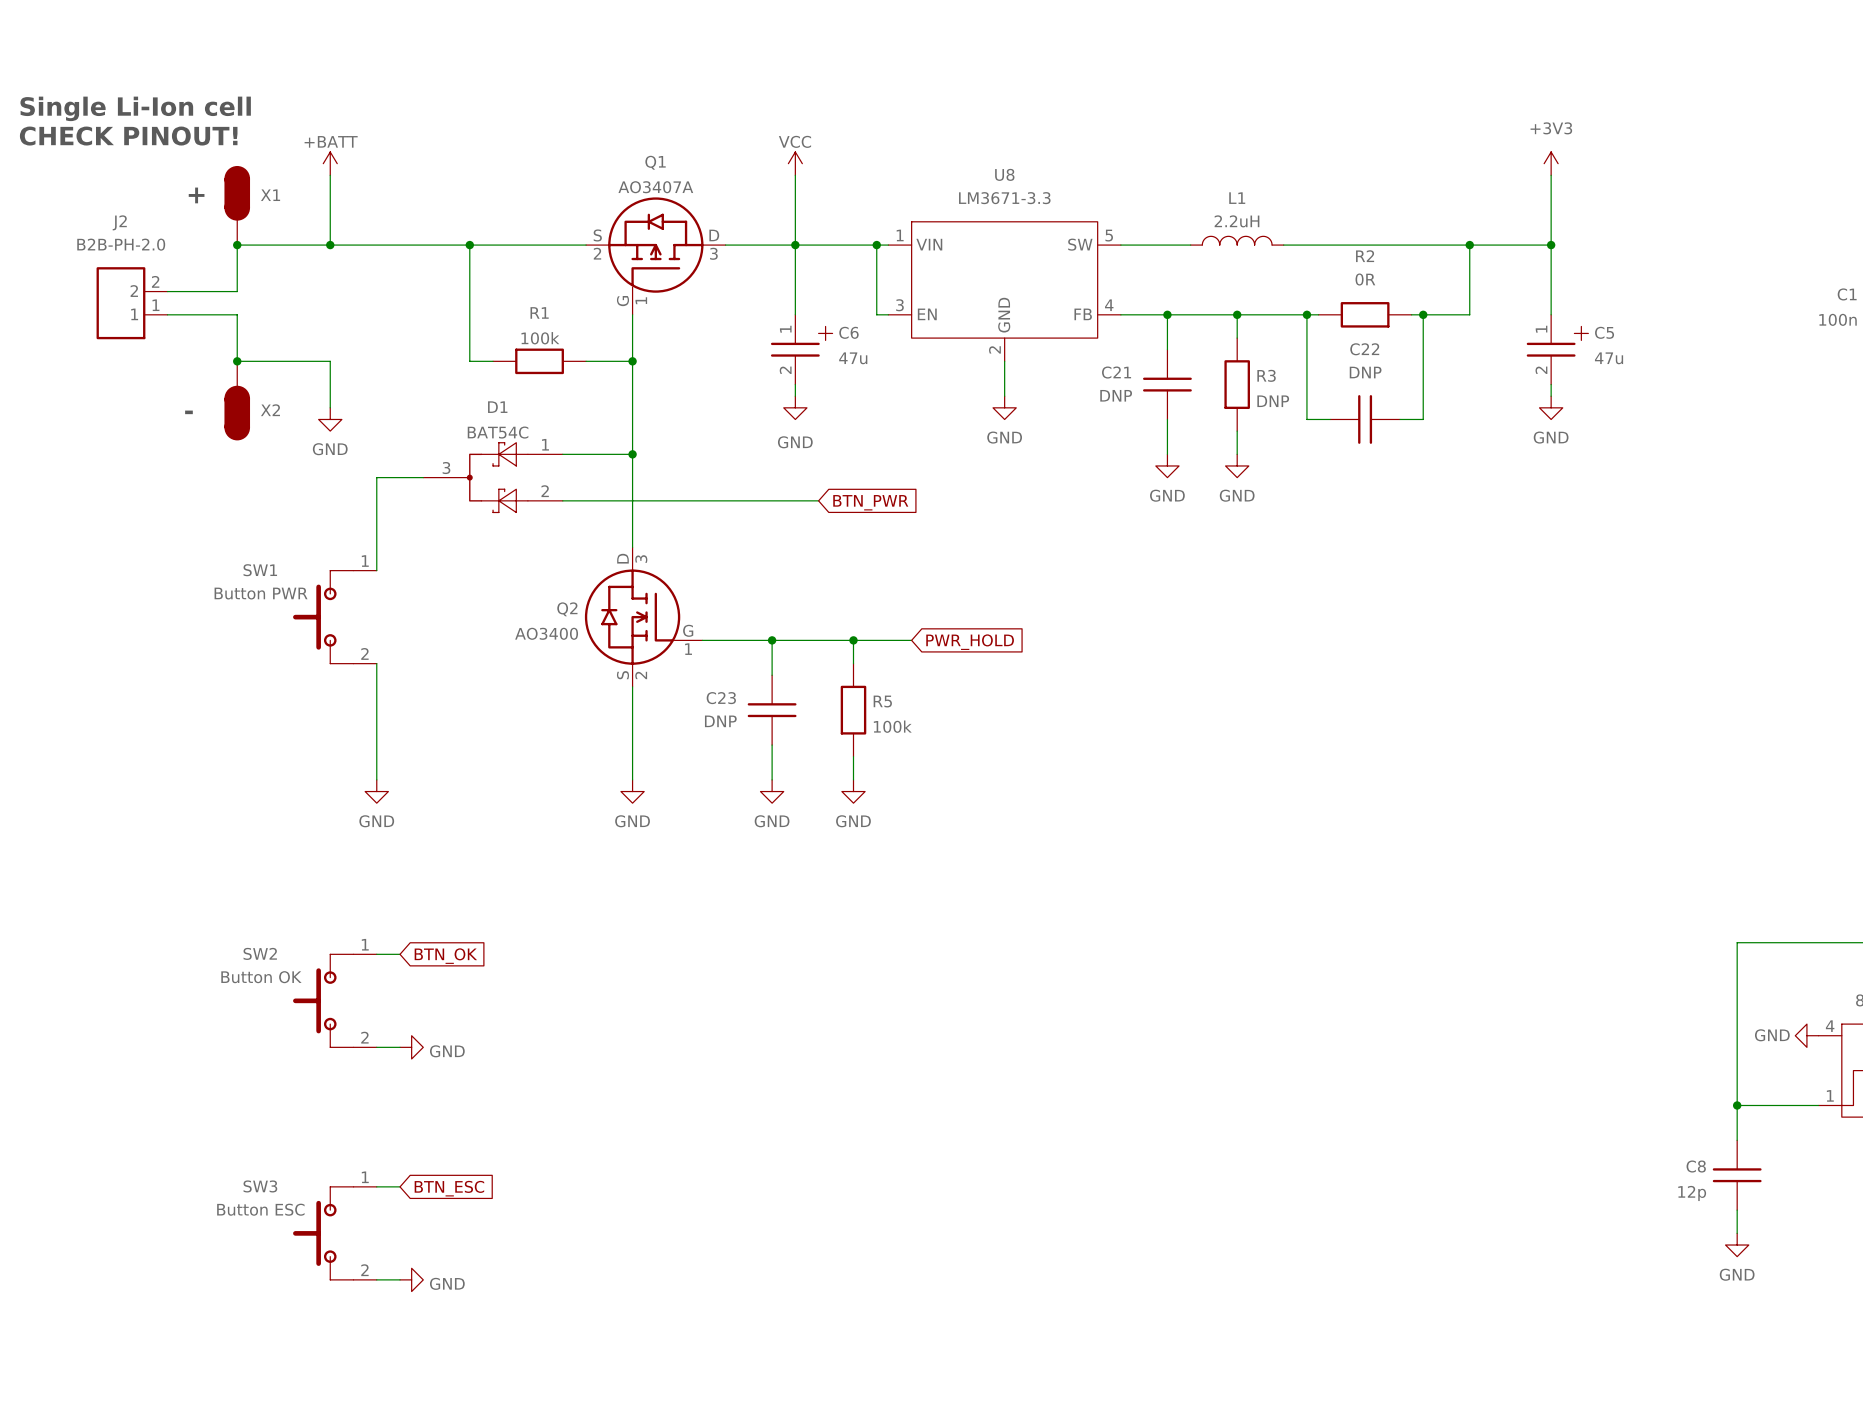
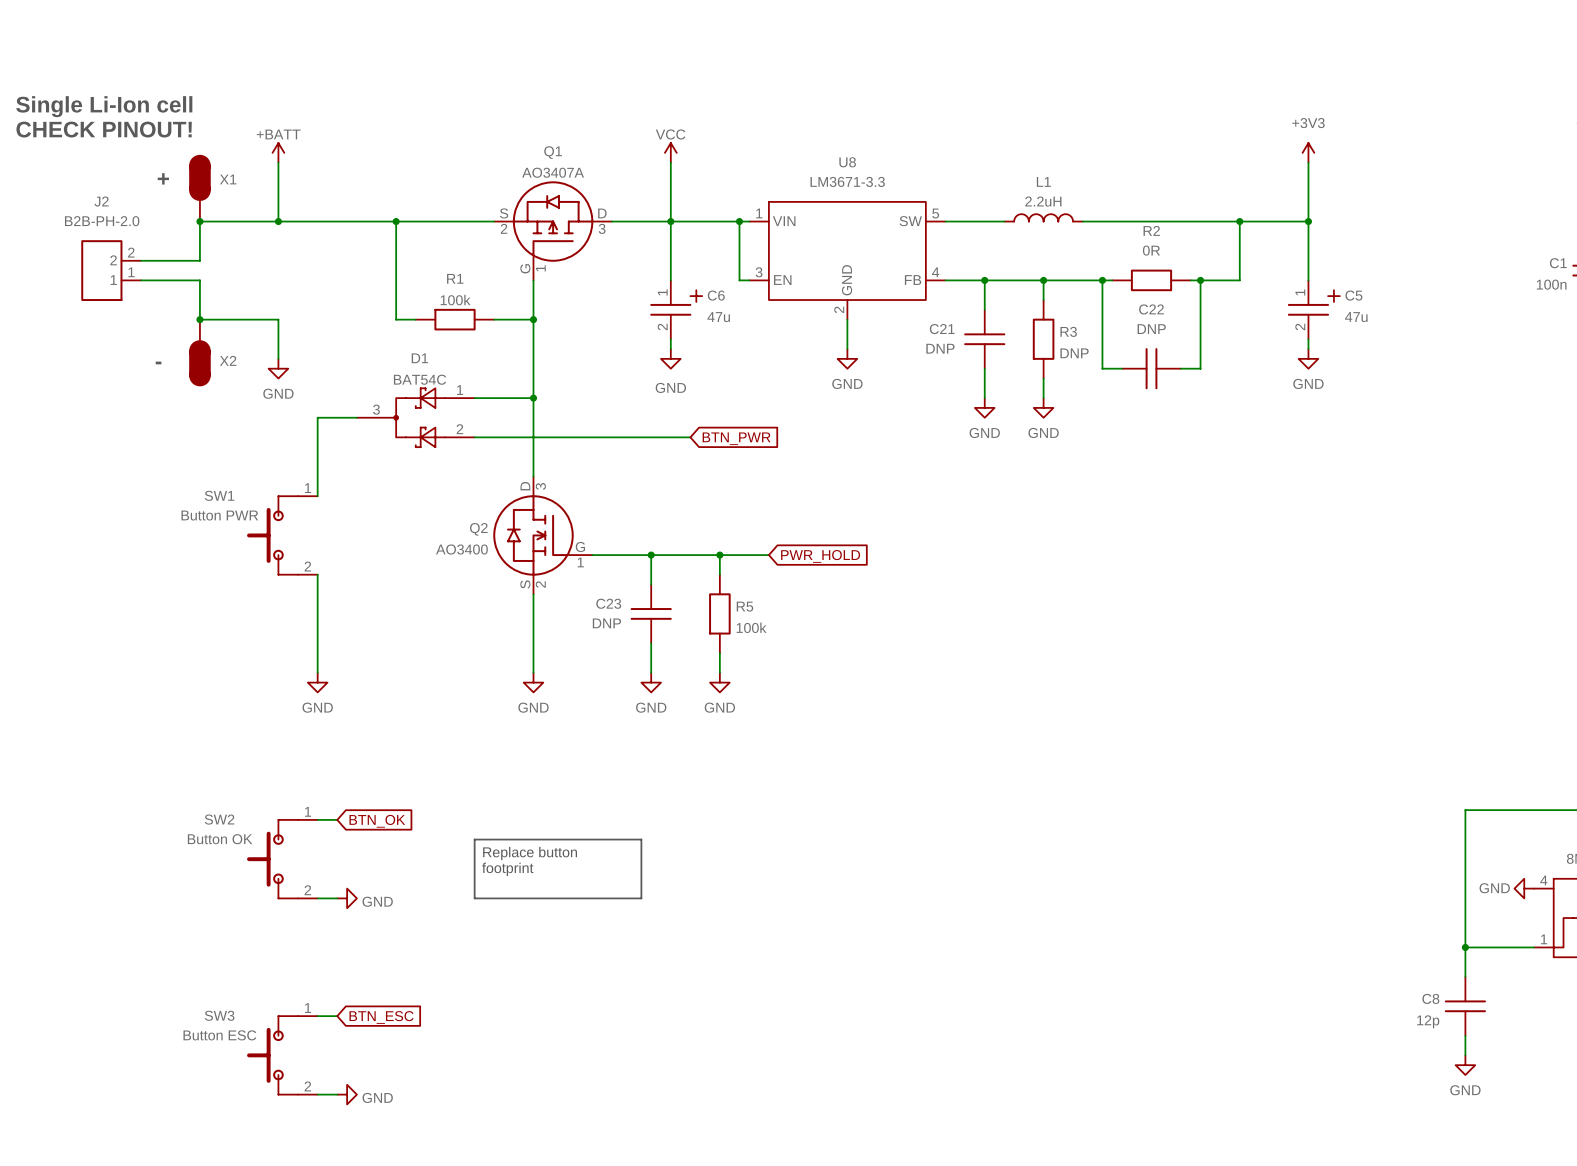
line: none -> (474, 839) (641, 839) (641, 898) (474, 898) (474, 839)
text: none -> Replace button (530, 853)
text: none -> footprint (507, 869)

